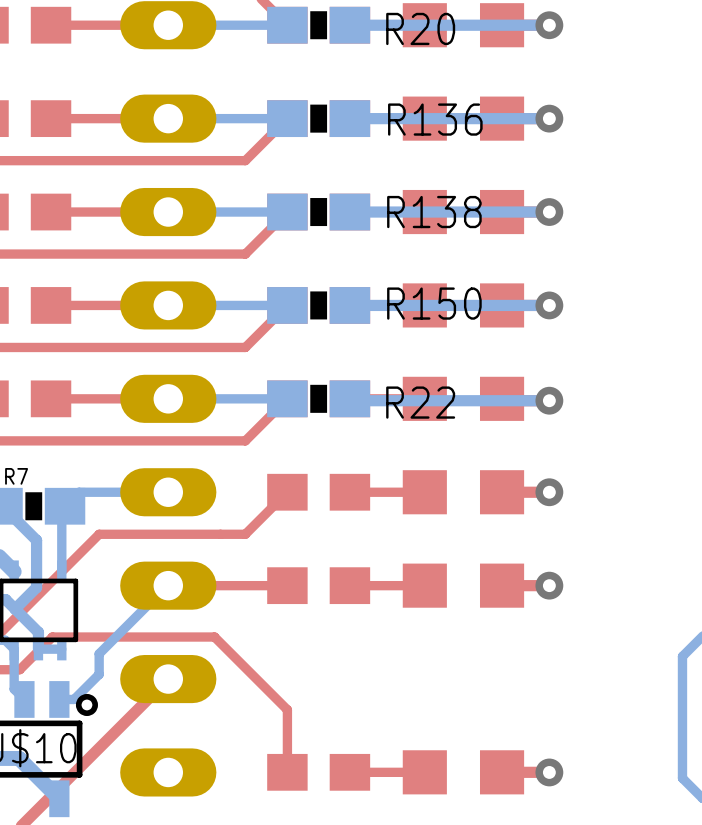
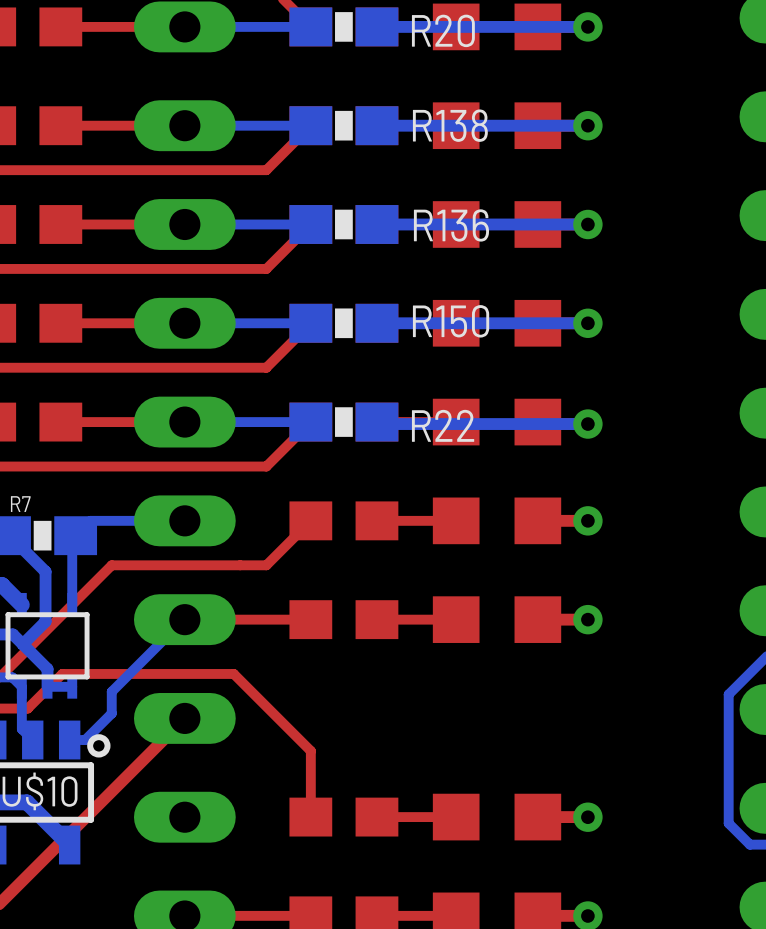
R136 name: R136 (435, 119) -> R138 (450, 125)
R138 name: R138 (434, 212) -> R136 (451, 225)

